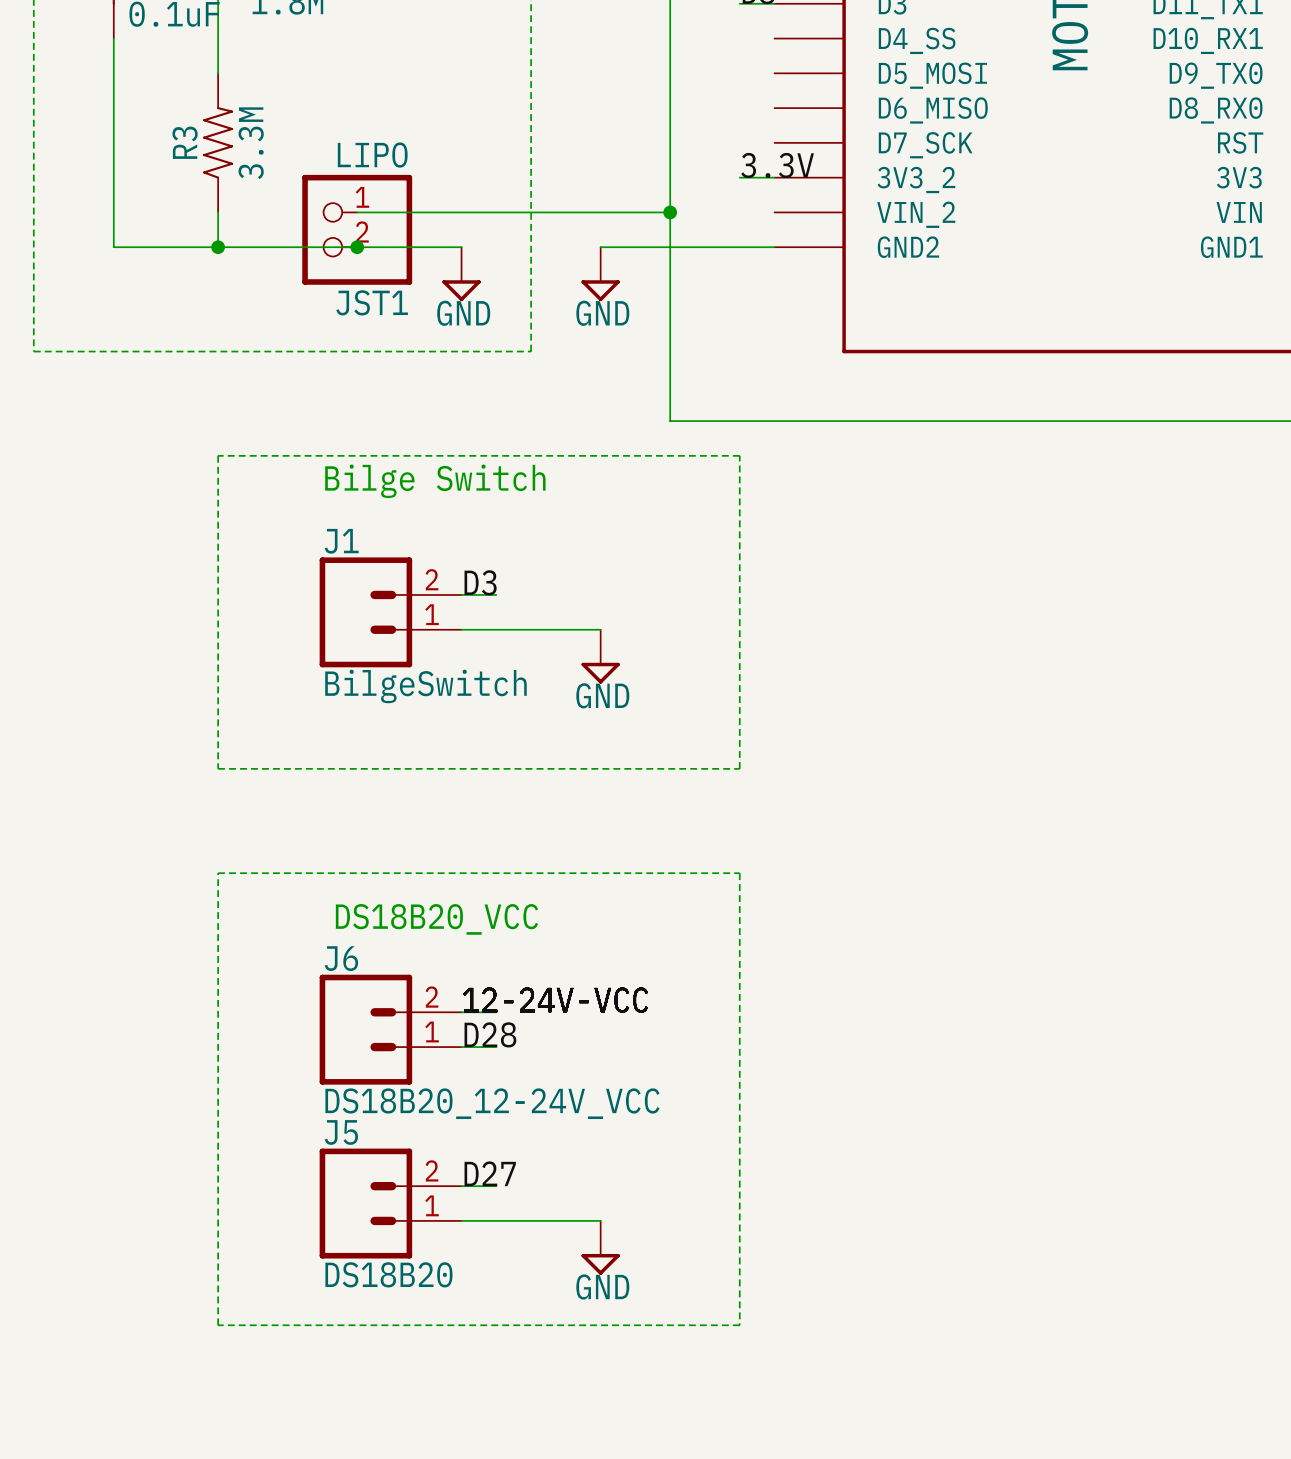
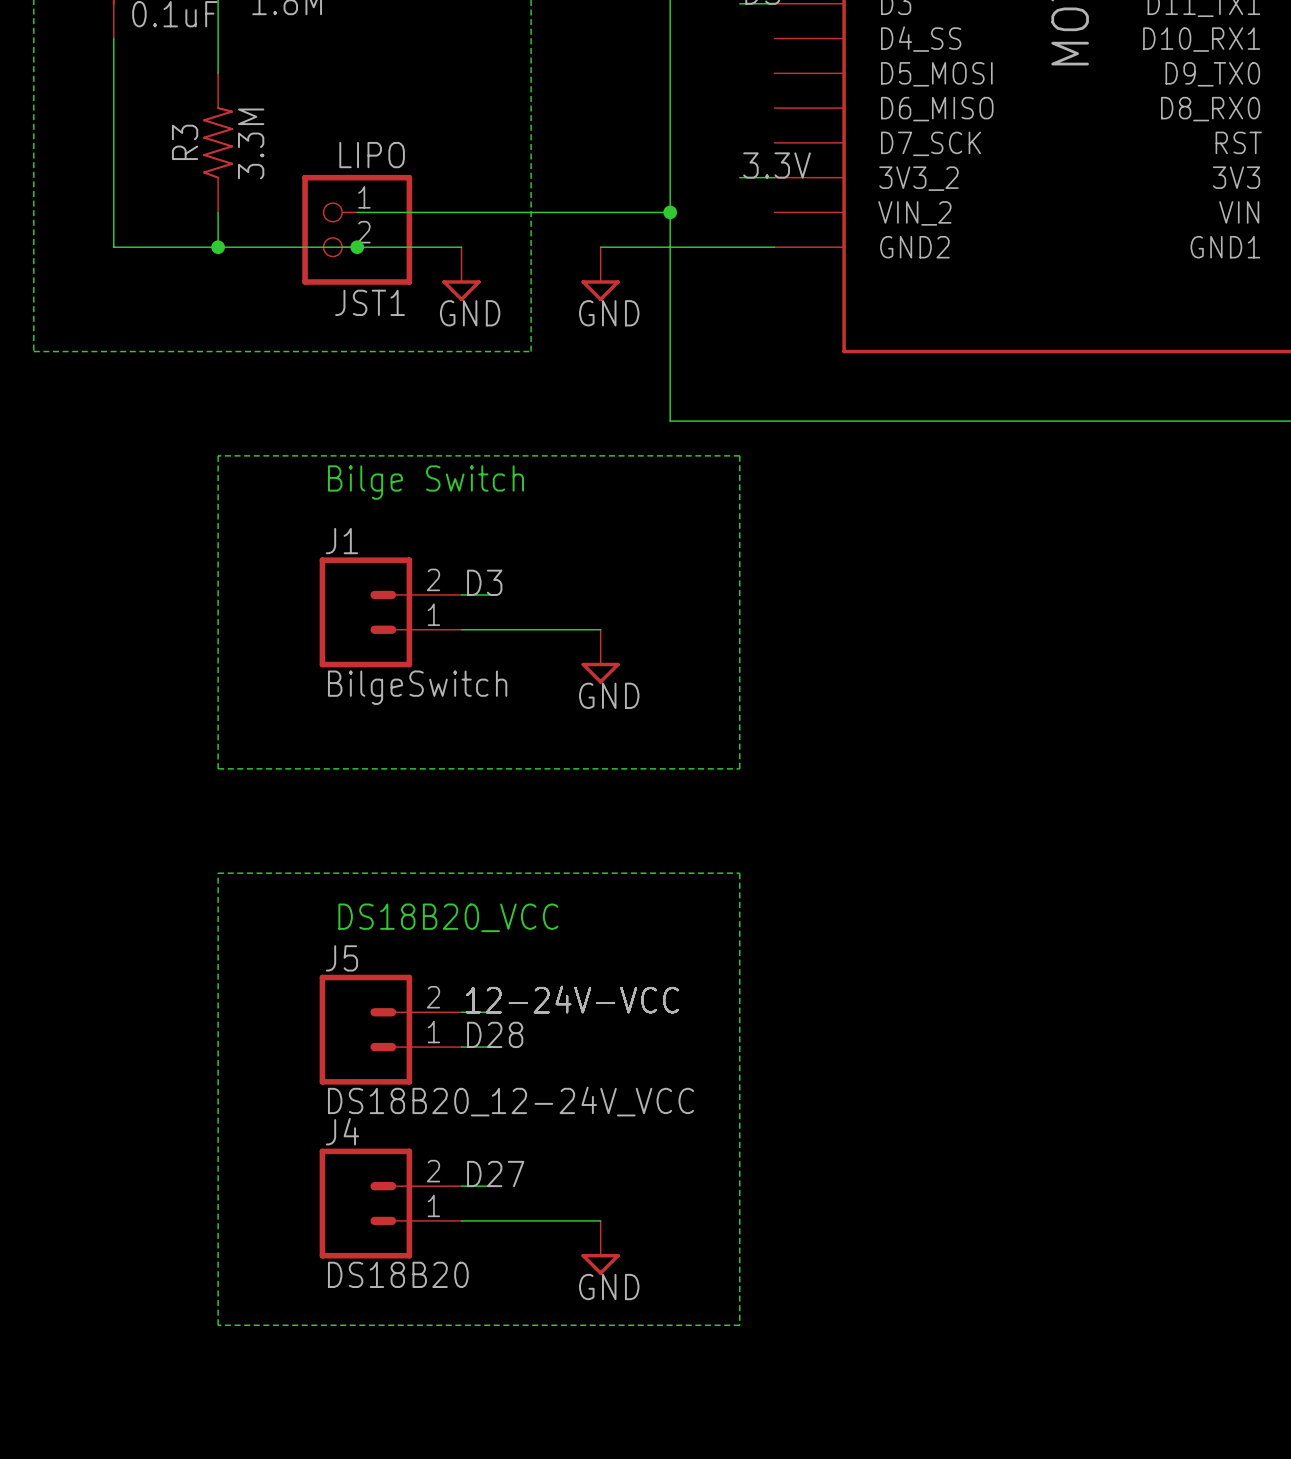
J6 name: J6 (341, 958) -> J5 (341, 958)
J5 name: J5 (341, 1132) -> J4 (342, 1131)

